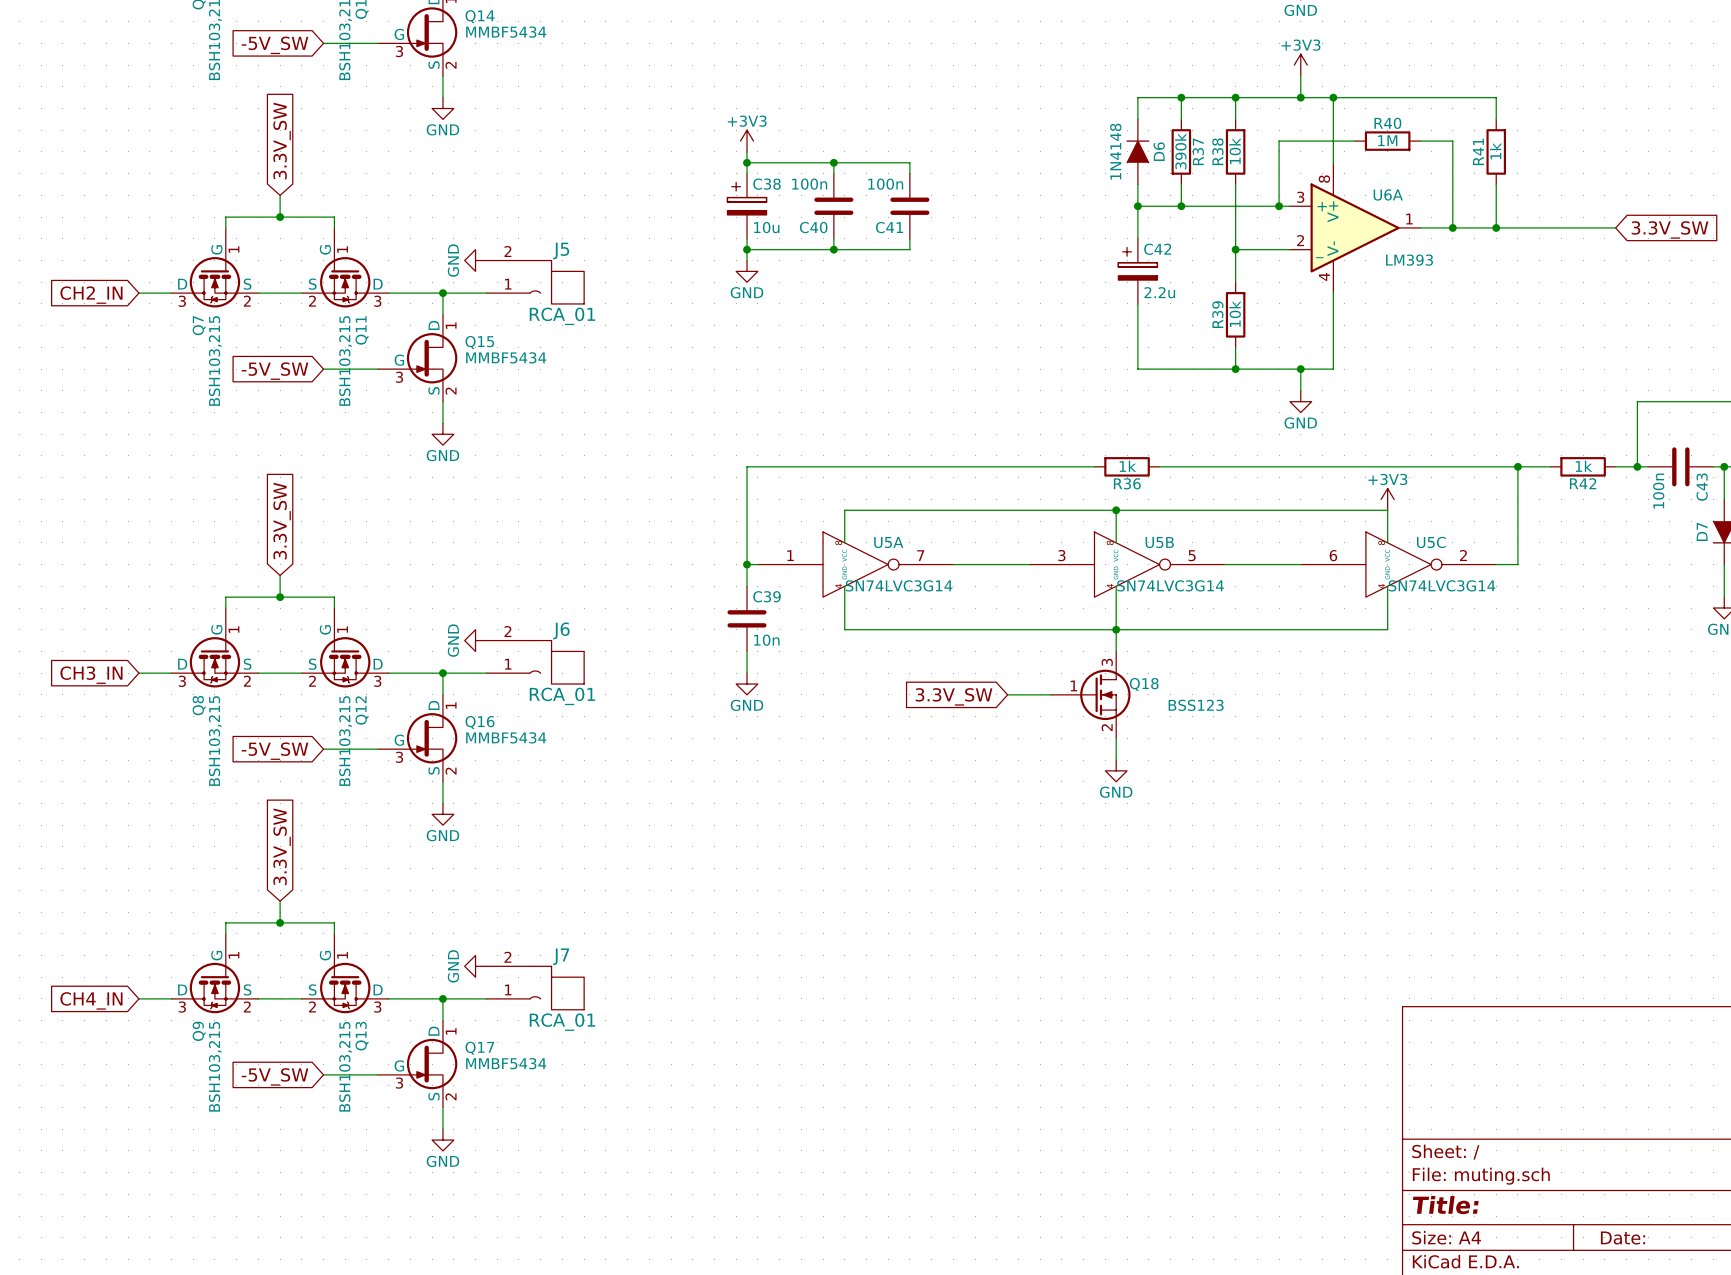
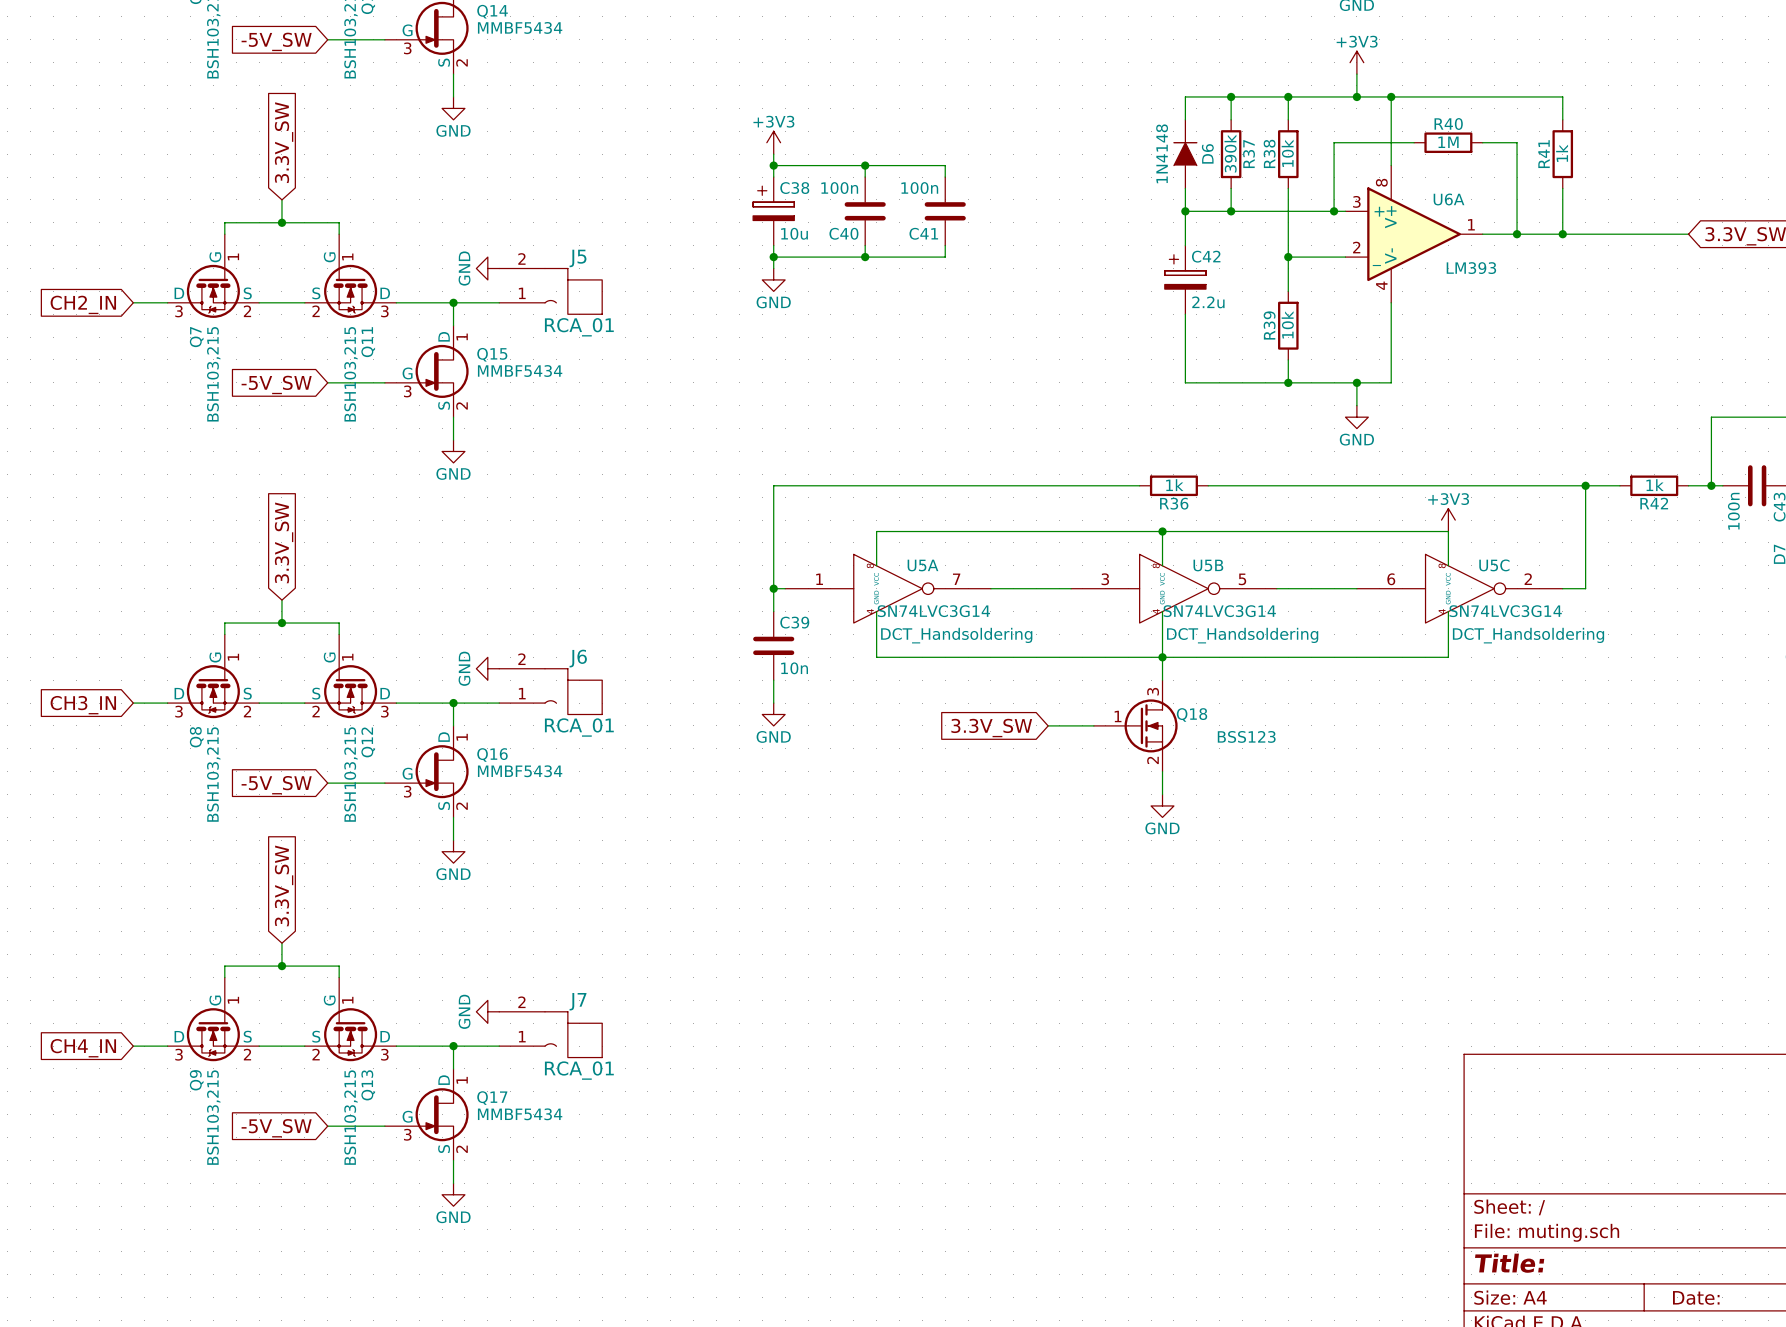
U5A text: none -> DCT_Handsoldering (956, 635)
U5B text: none -> DCT_Handsoldering (1242, 635)
U5C text: none -> DCT_Handsoldering (1528, 635)

